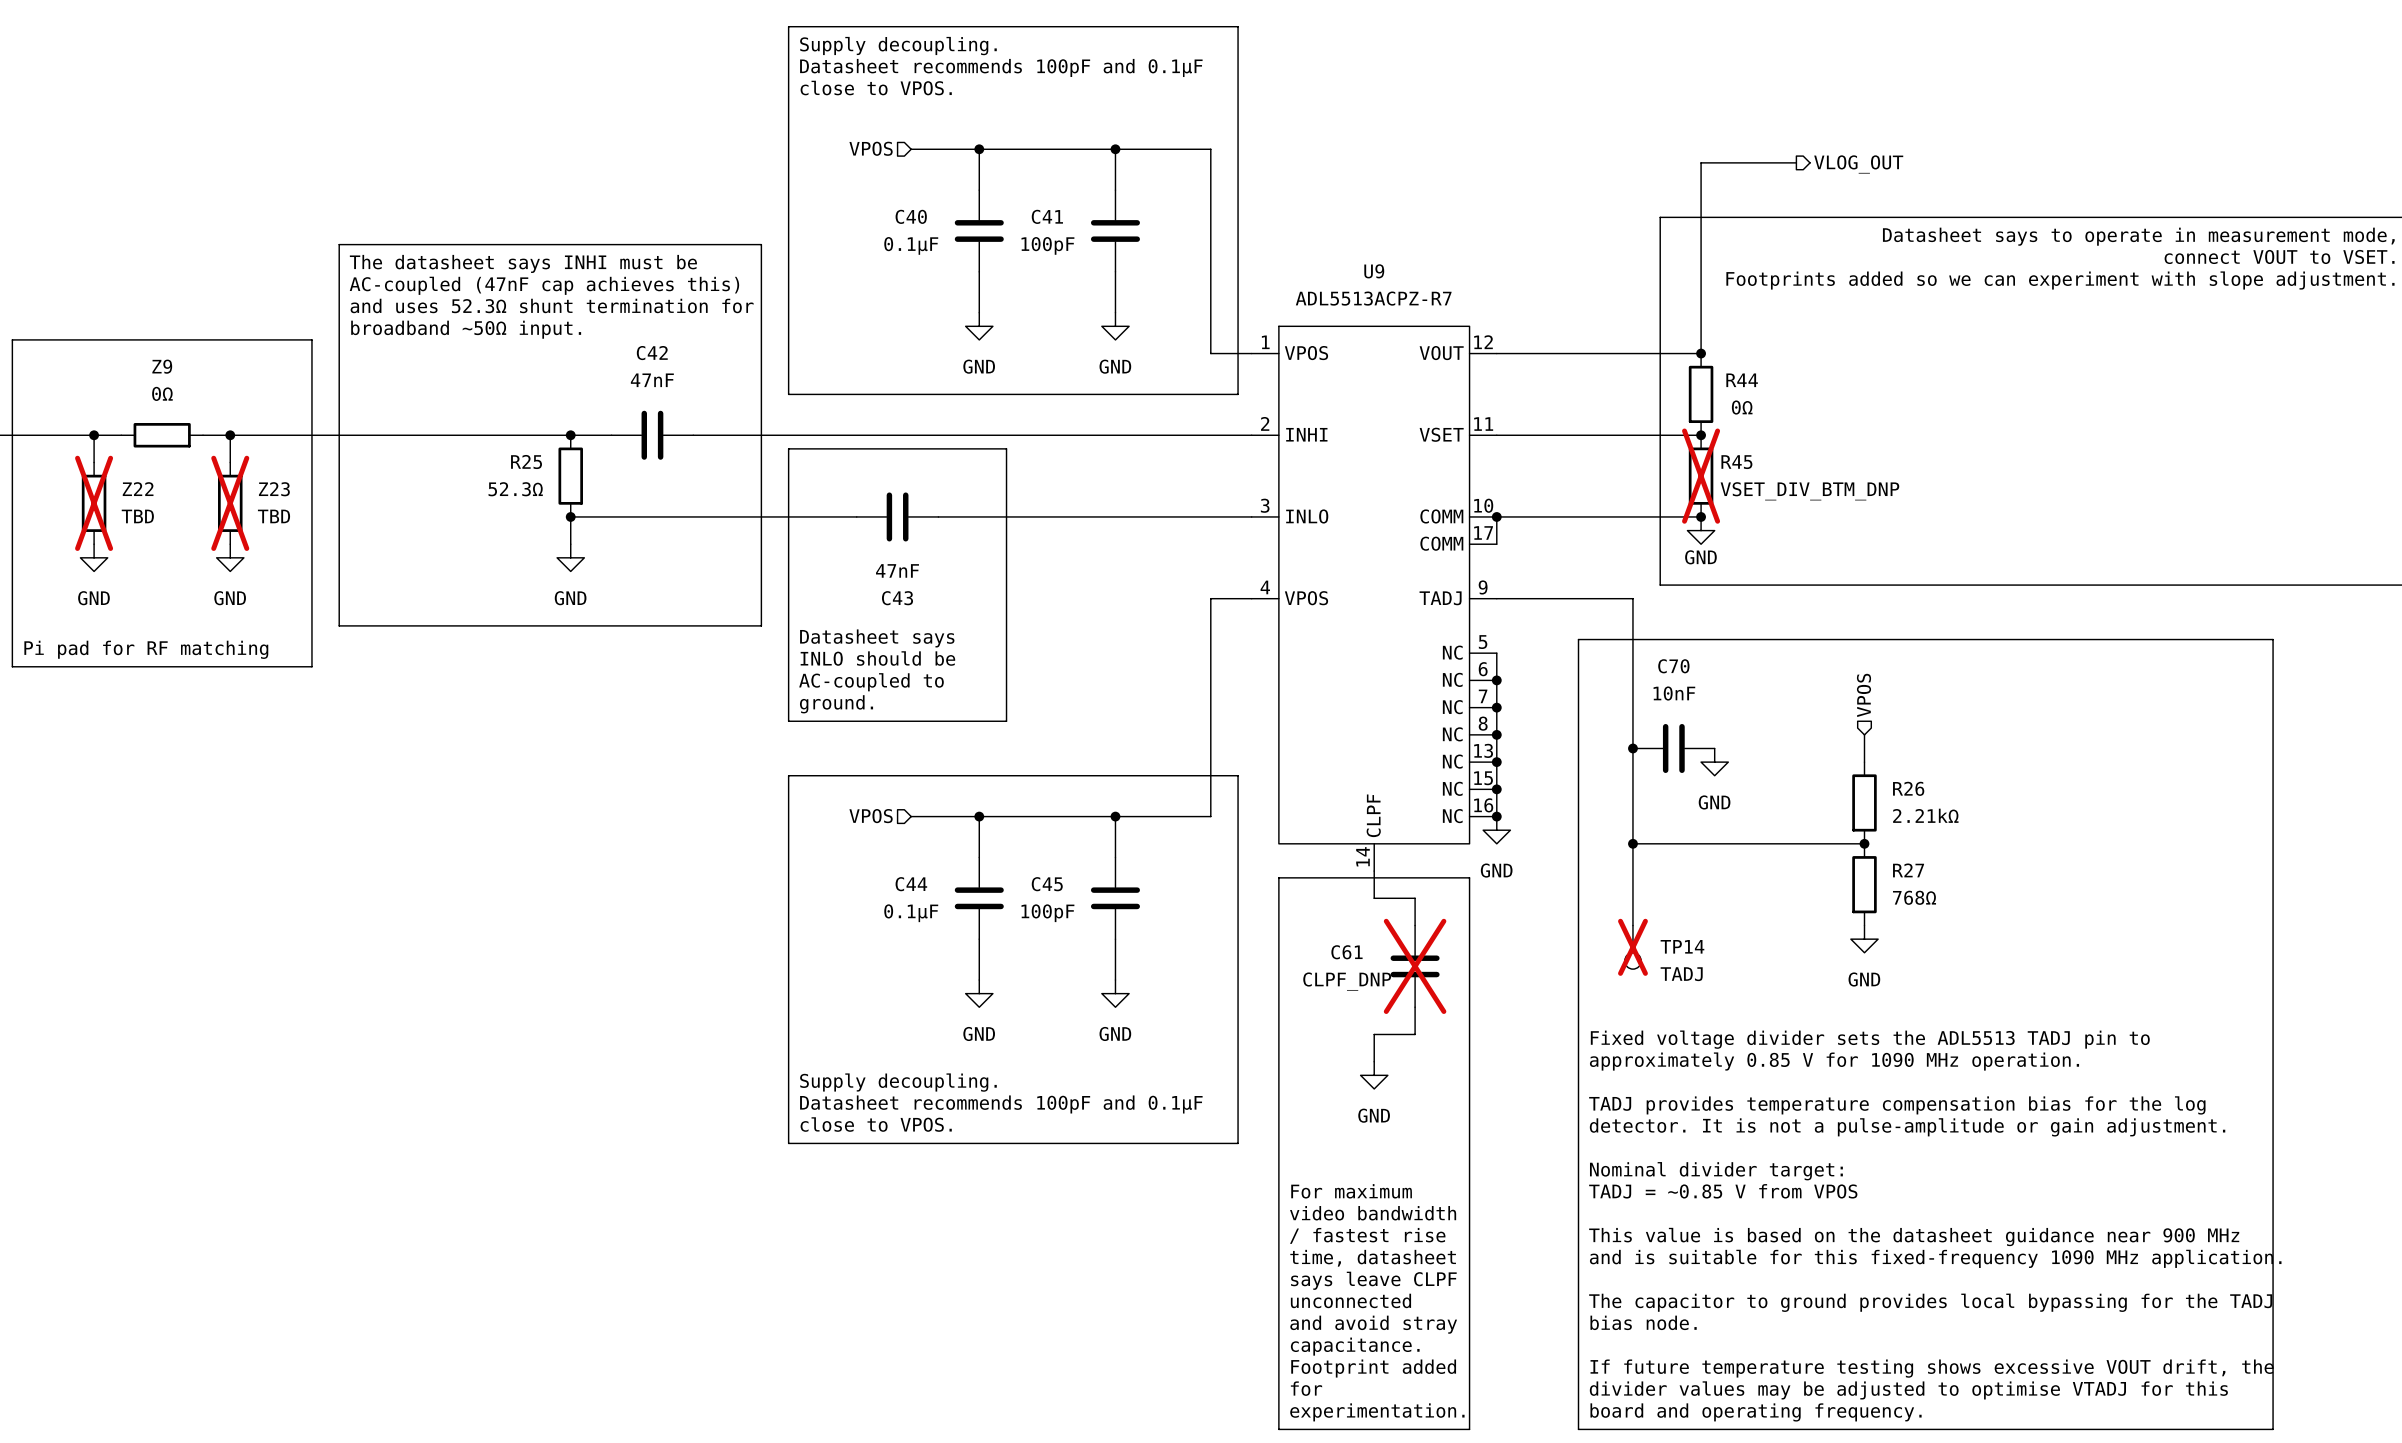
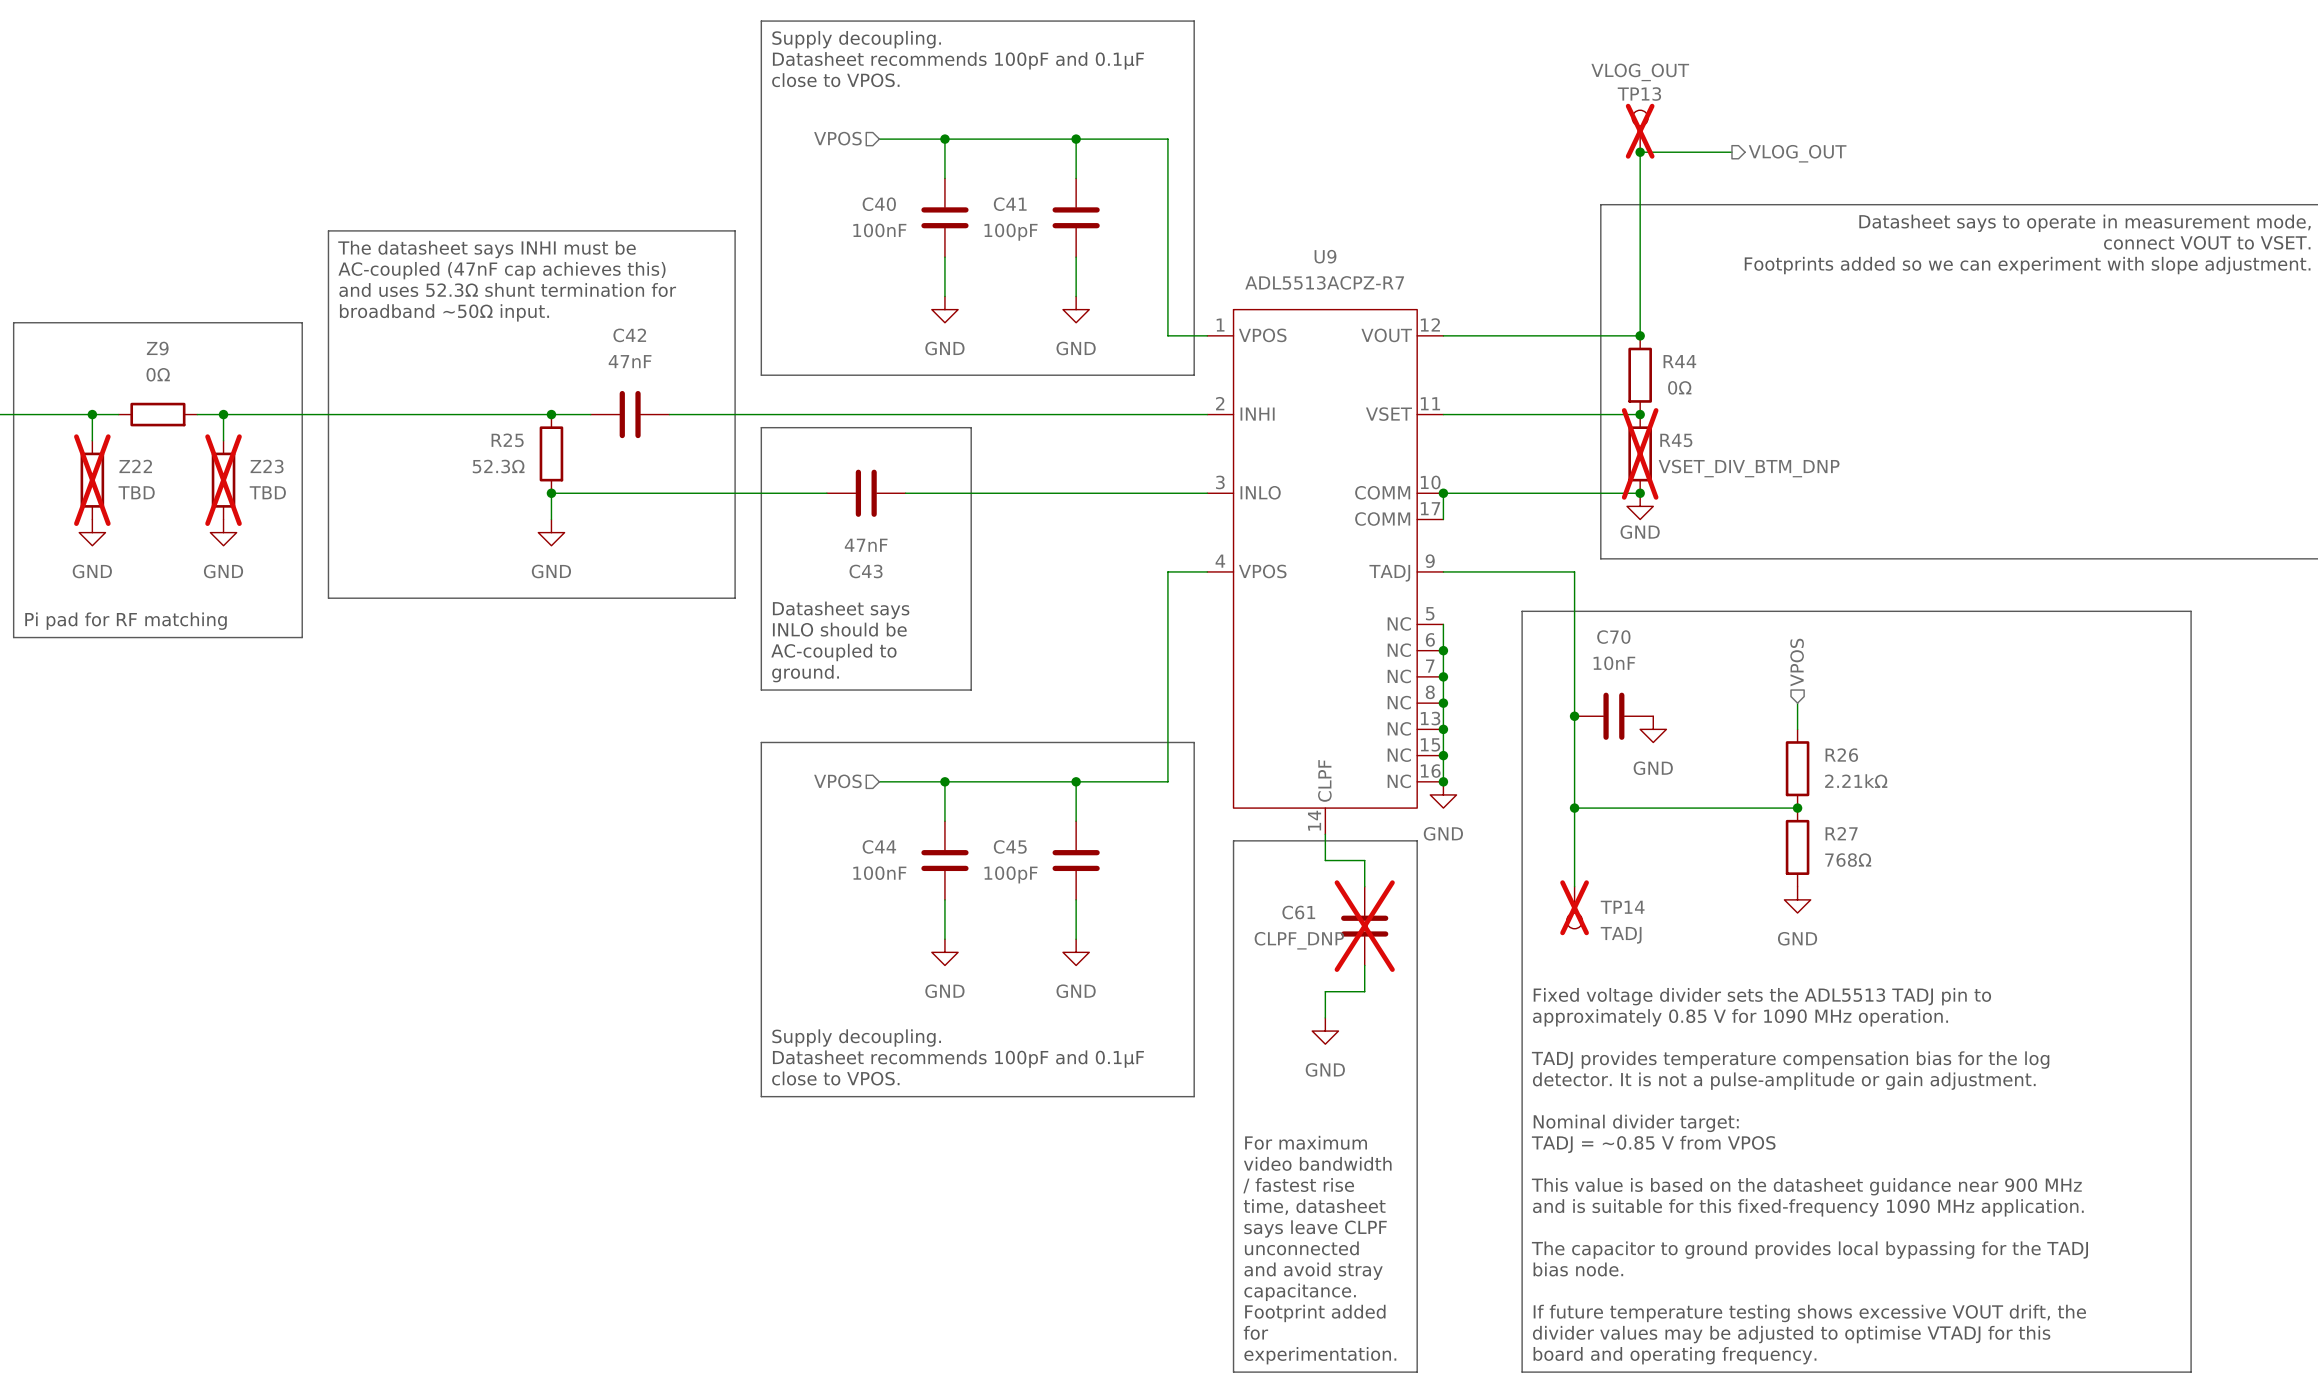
TP13: none -> VLOG_OUT (1640, 131)
junction: none -> (1640, 152)
C40 value: 0.1µF (911, 245) -> 100nF (879, 230)
C44 value: 0.1µF (911, 913) -> 100nF (879, 873)

